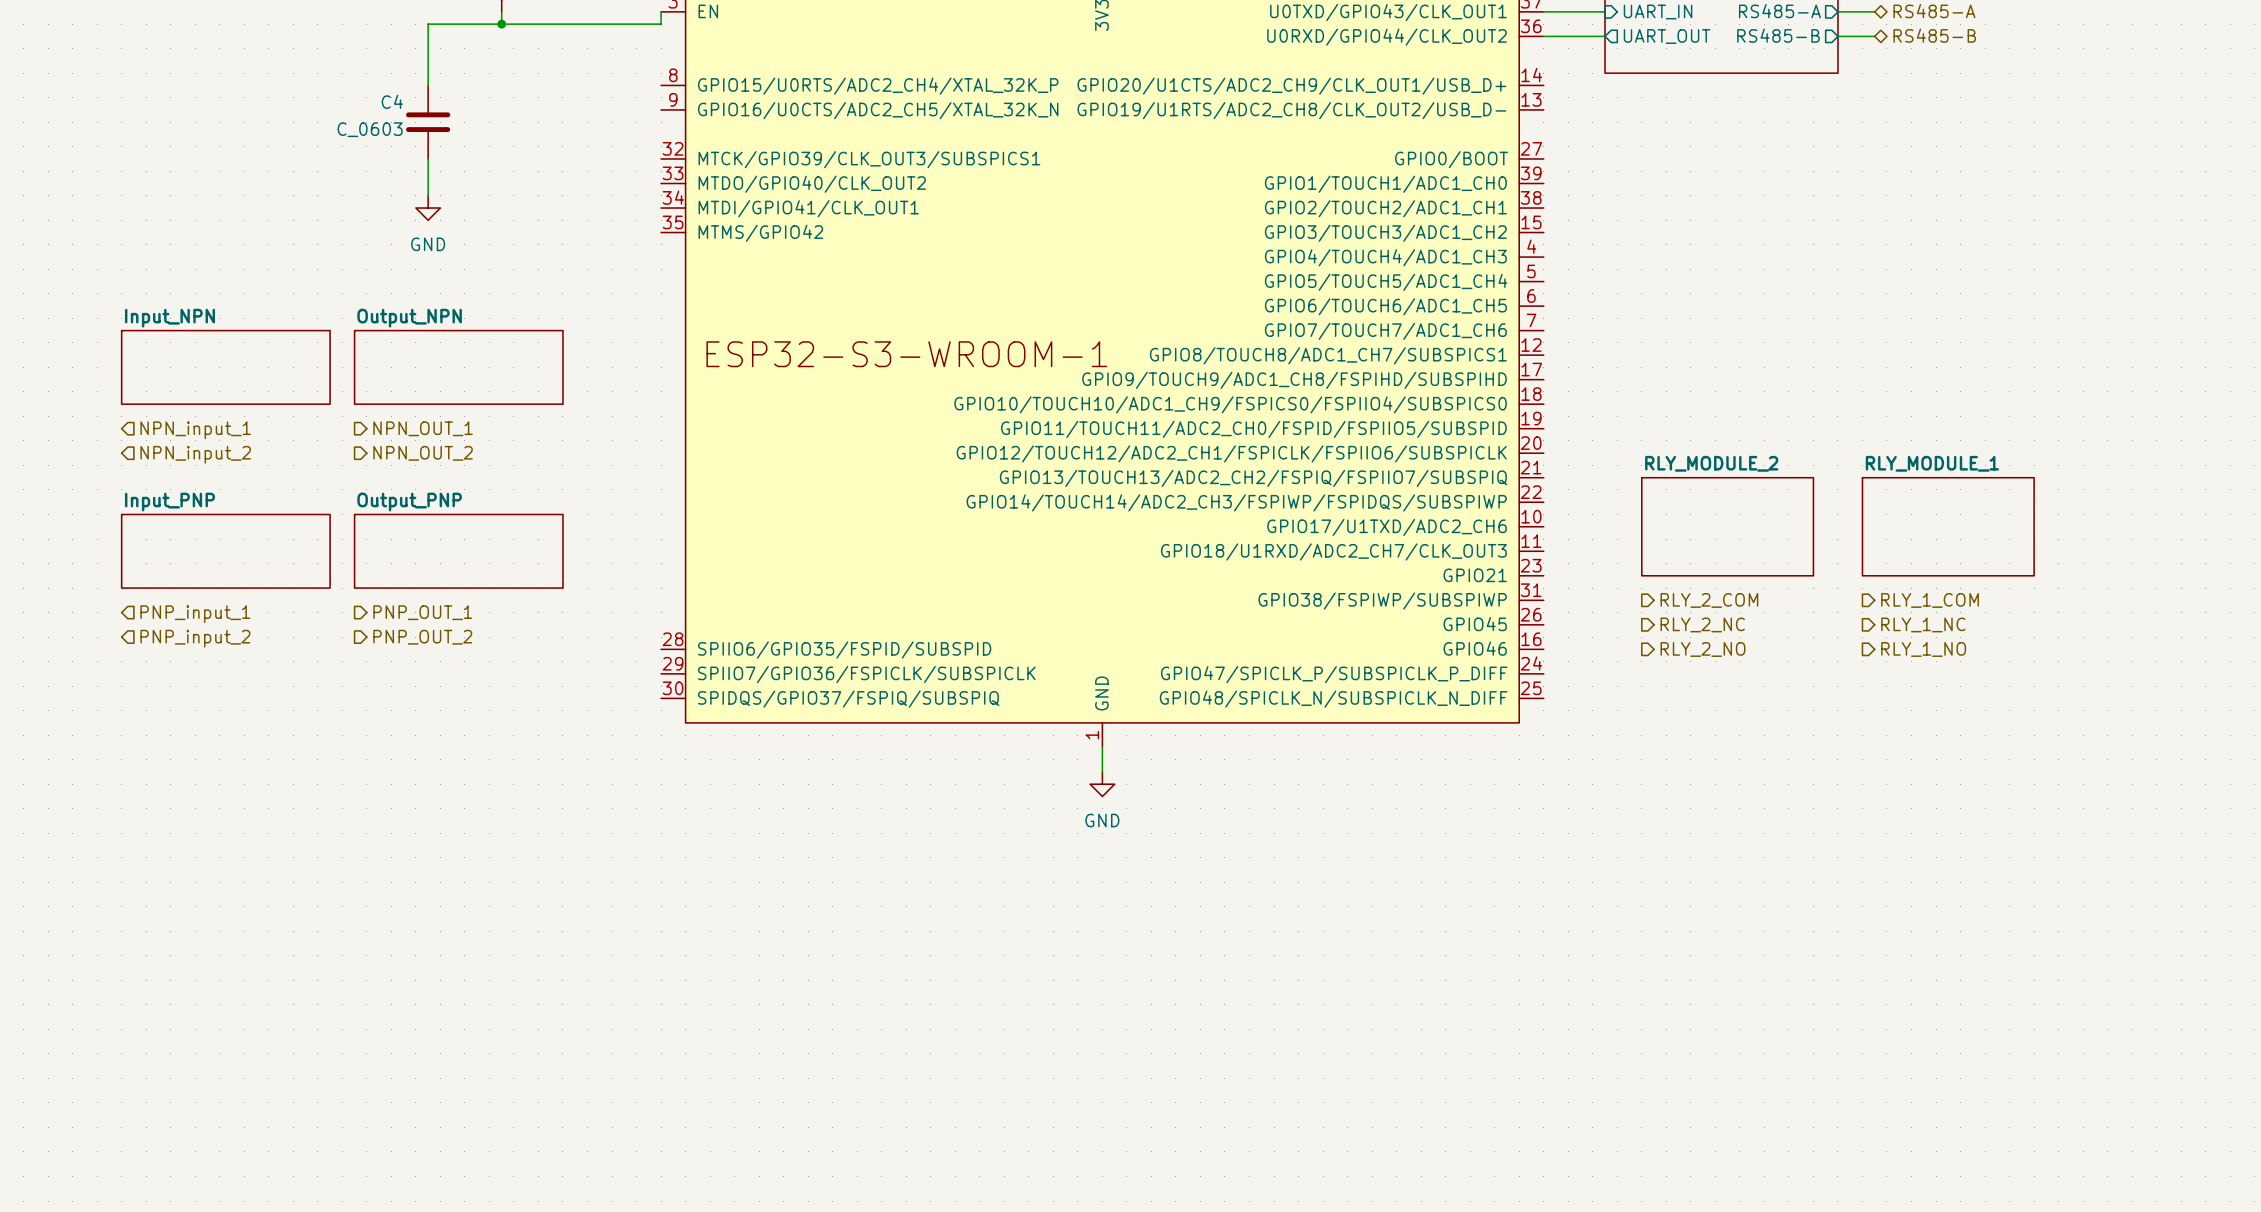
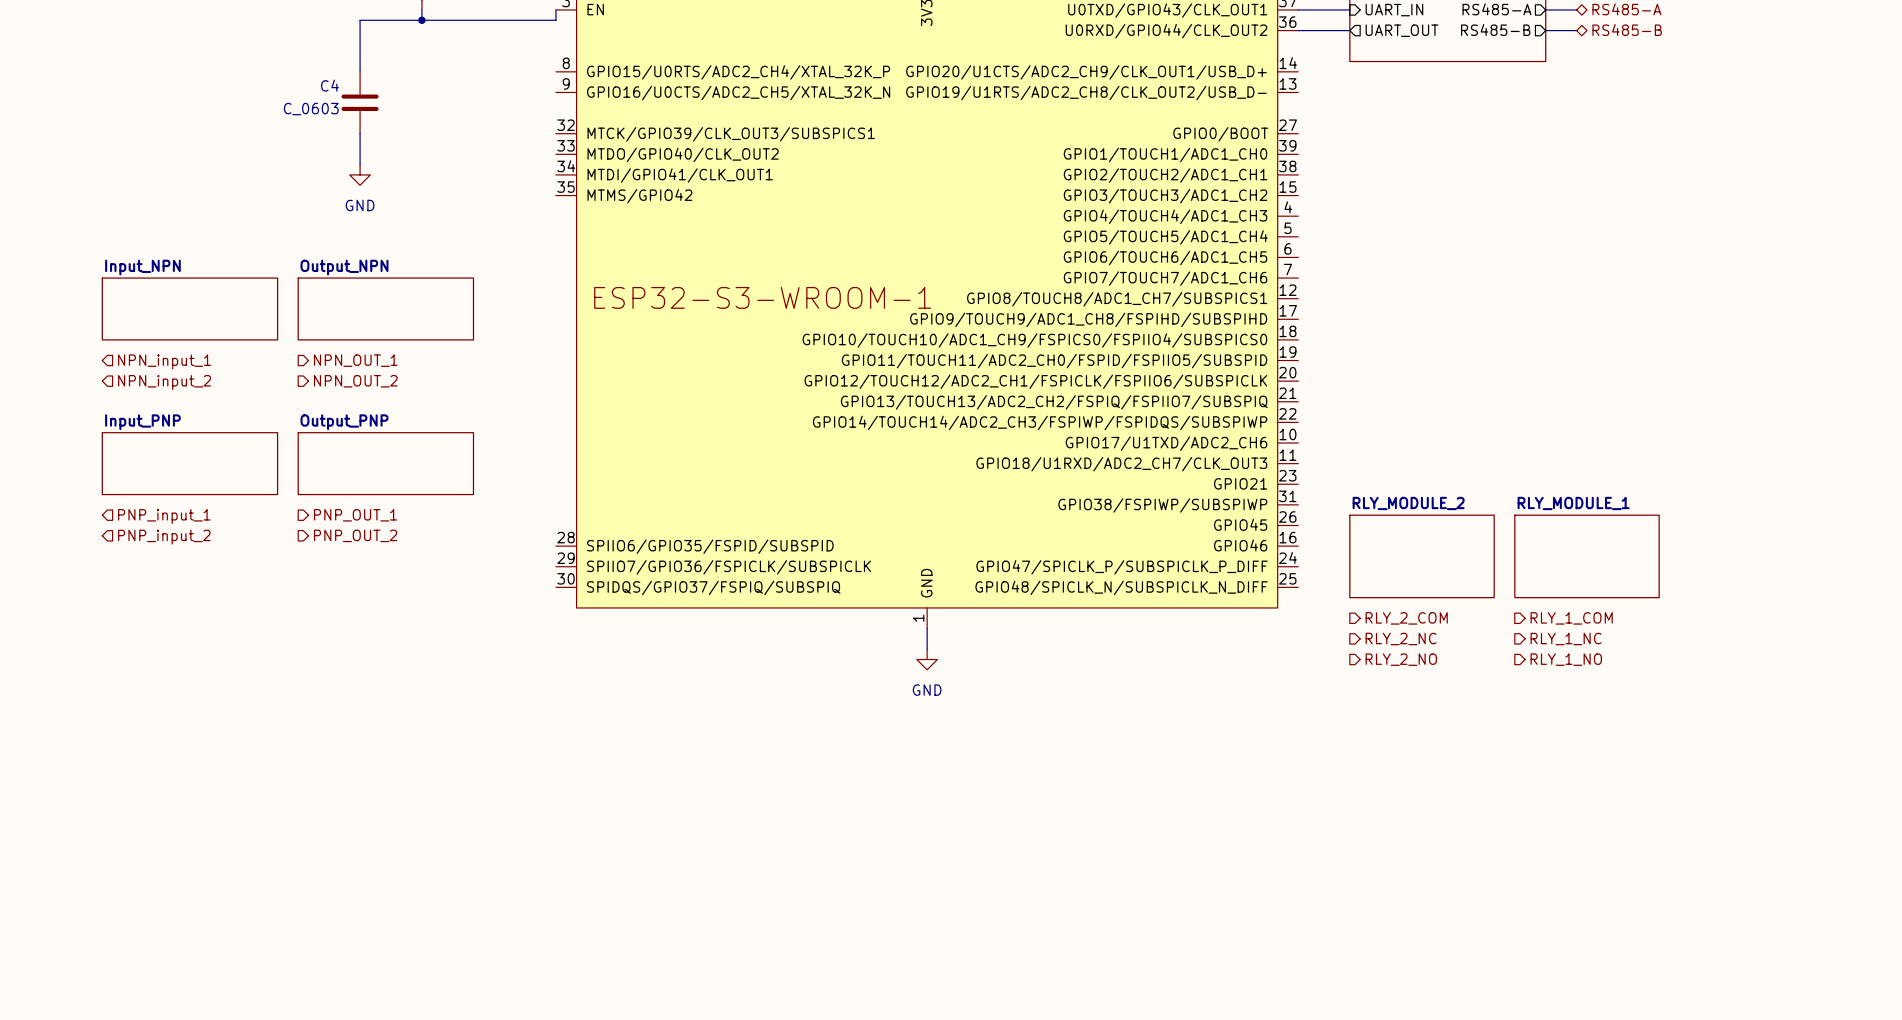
sheet RLY_MODULE_2 position: (1727, 526) -> (1422, 556)
sheet RLY_MODULE_1 position: (1948, 526) -> (1586, 556)
hierarchical label position: RLY_2_COM (1709, 600) -> RLY_2_COM (1406, 618)
hierarchical label position: RLY_1_COM (1930, 600) -> RLY_1_COM (1571, 618)
hierarchical label position: RLY_2_NC (1702, 624) -> RLY_2_NC (1401, 639)
hierarchical label position: RLY_1_NC (1923, 624) -> RLY_1_NC (1566, 639)
hierarchical label position: RLY_2_NO (1702, 649) -> RLY_2_NO (1401, 659)
hierarchical label position: RLY_1_NO (1923, 649) -> RLY_1_NO (1566, 659)

